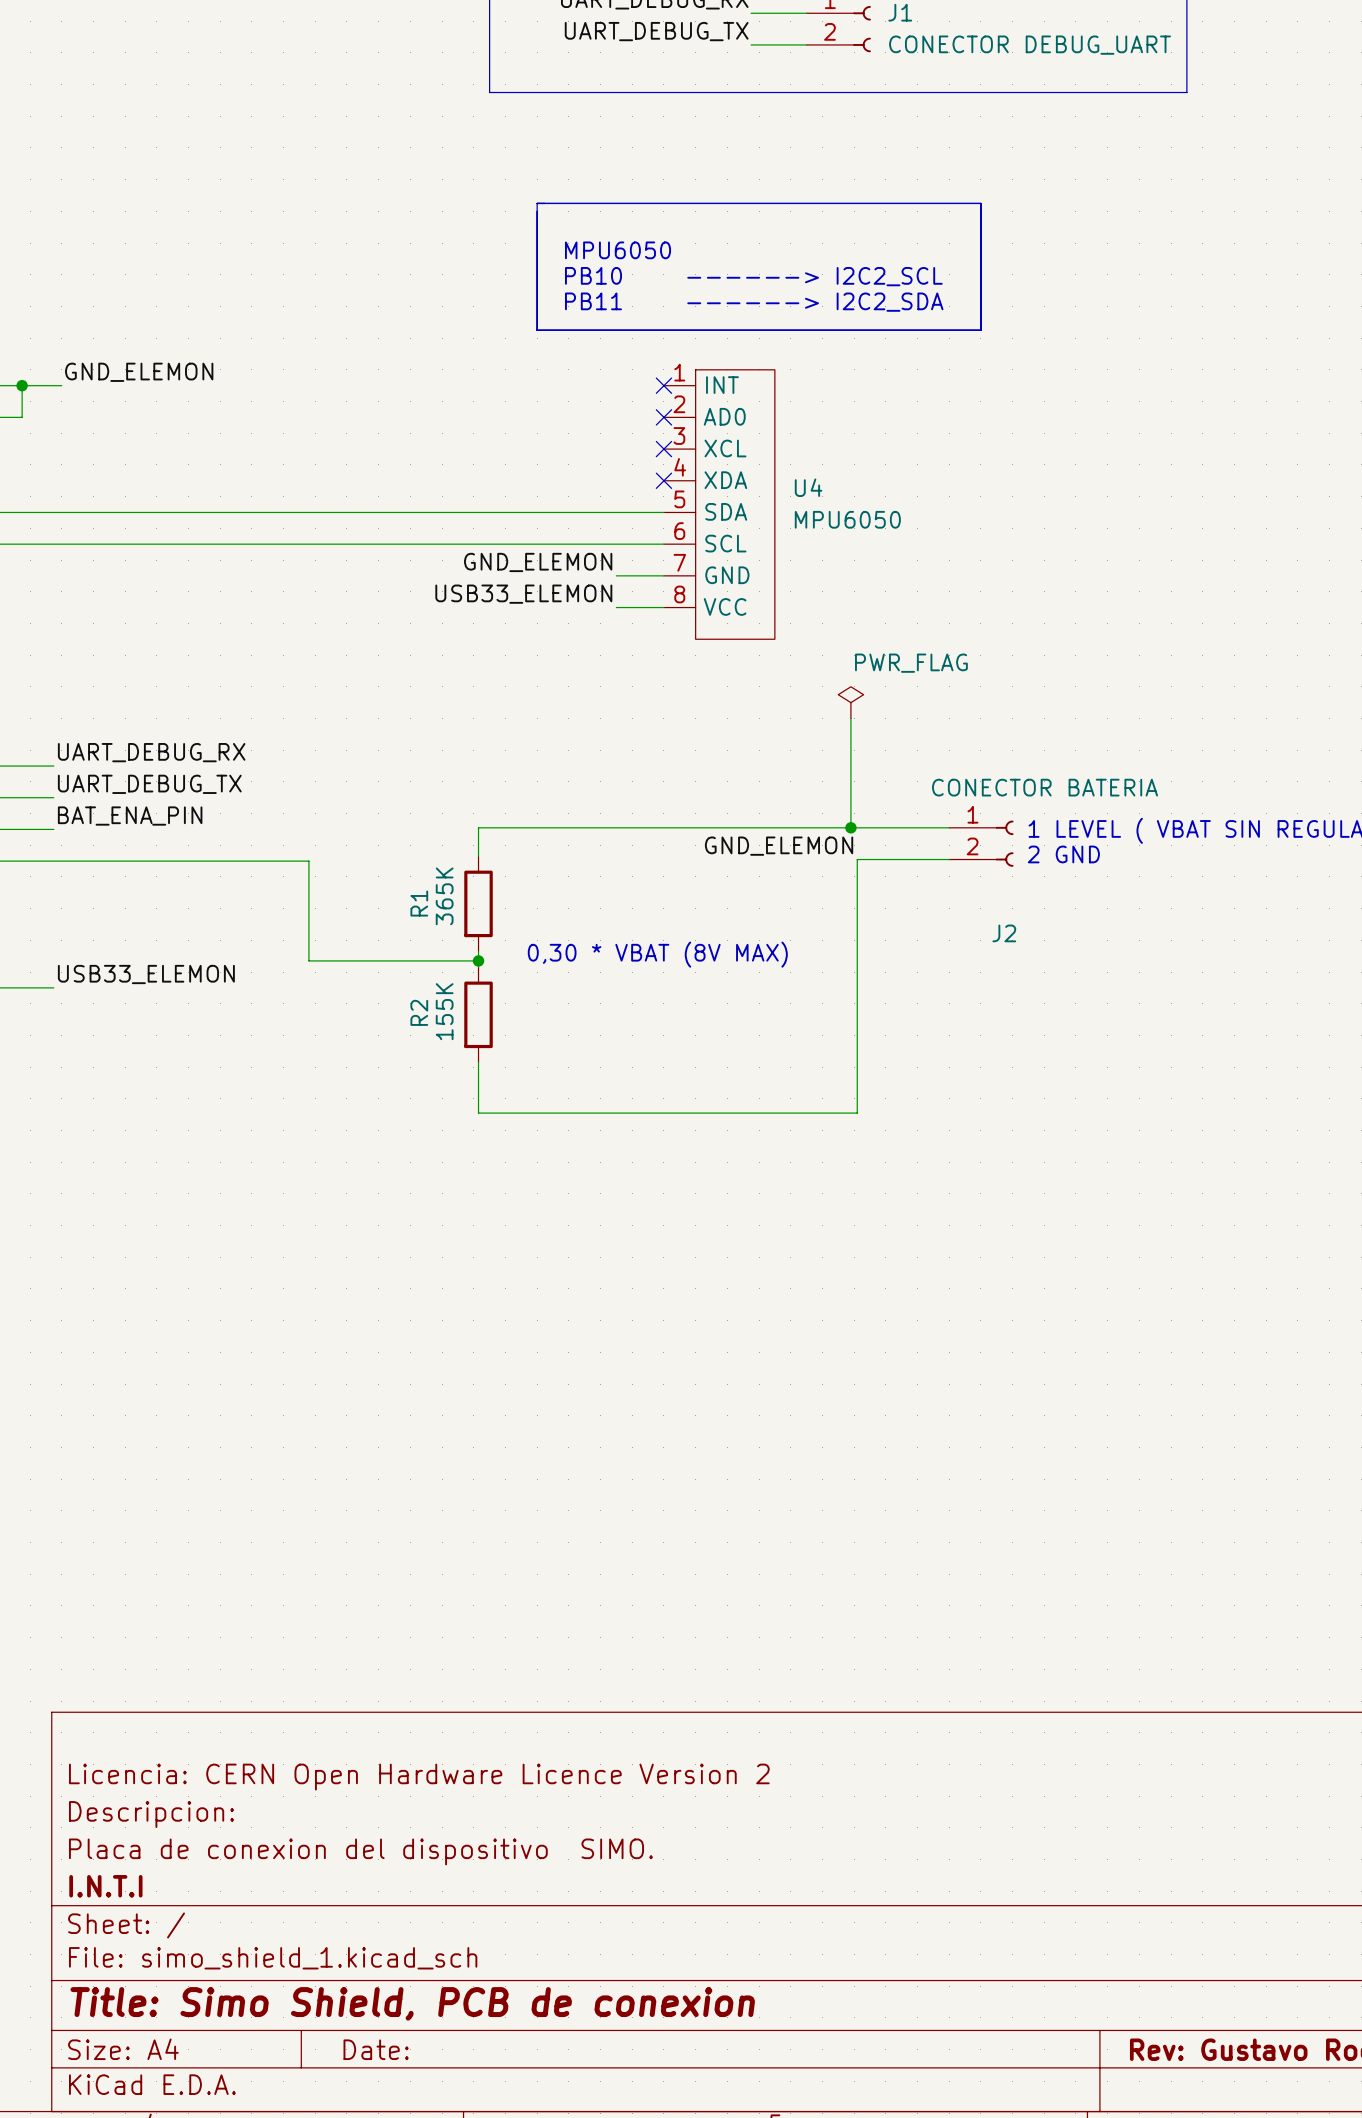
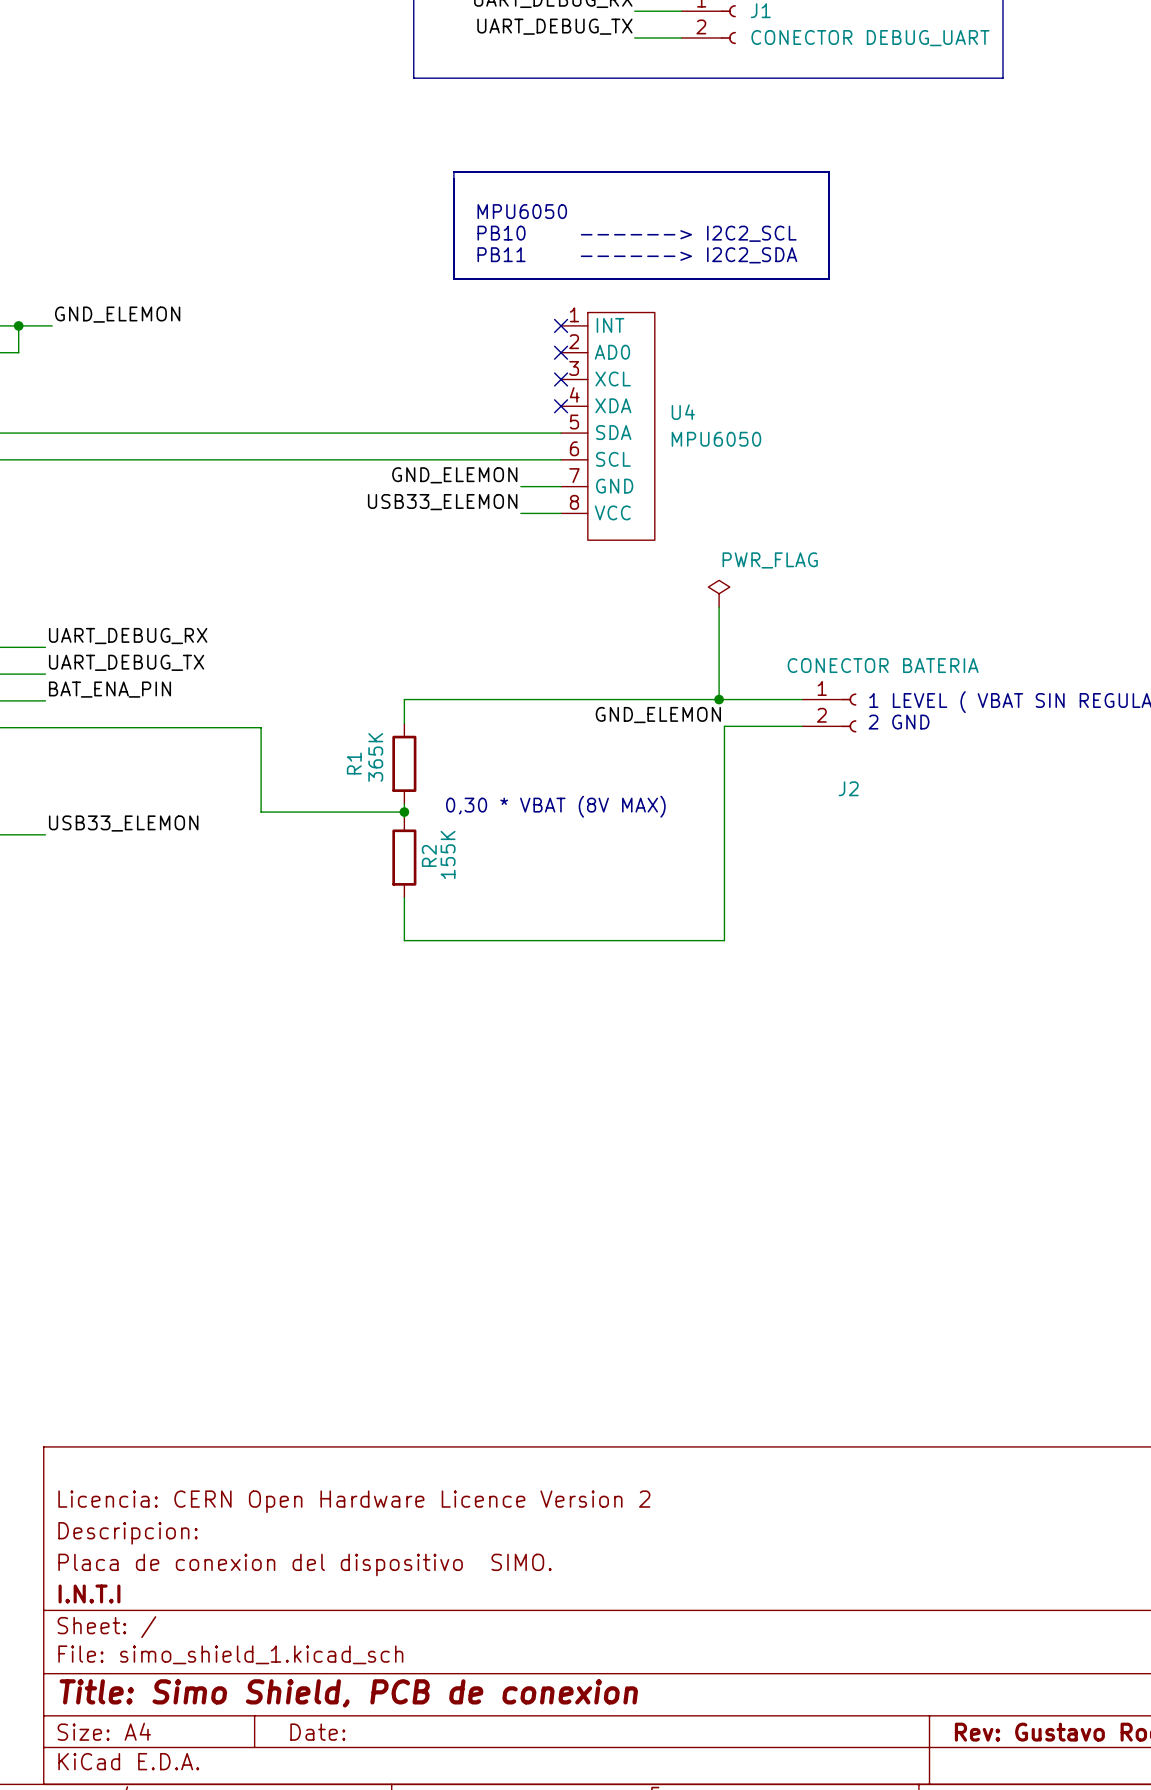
R2 value position: 155K (444, 1011) -> 155K (448, 854)
R2 name position: R2 (419, 1012) -> R2 (429, 855)

